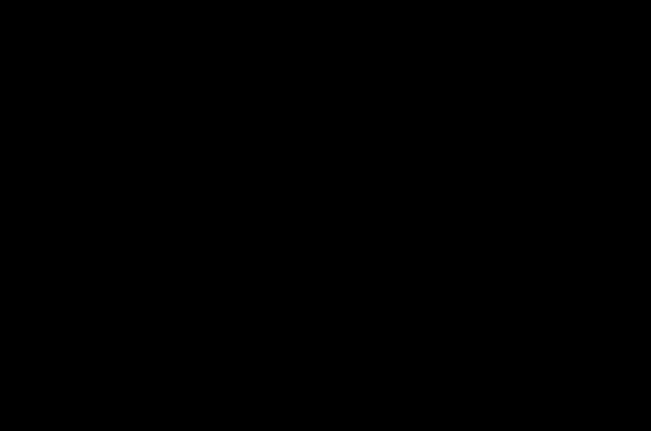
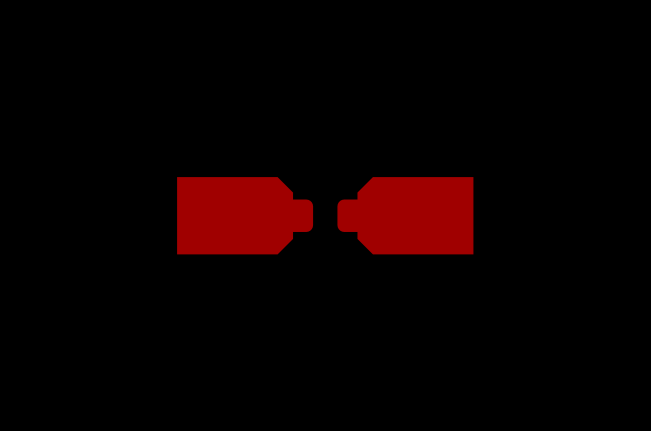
part: none -> (325, 215)

